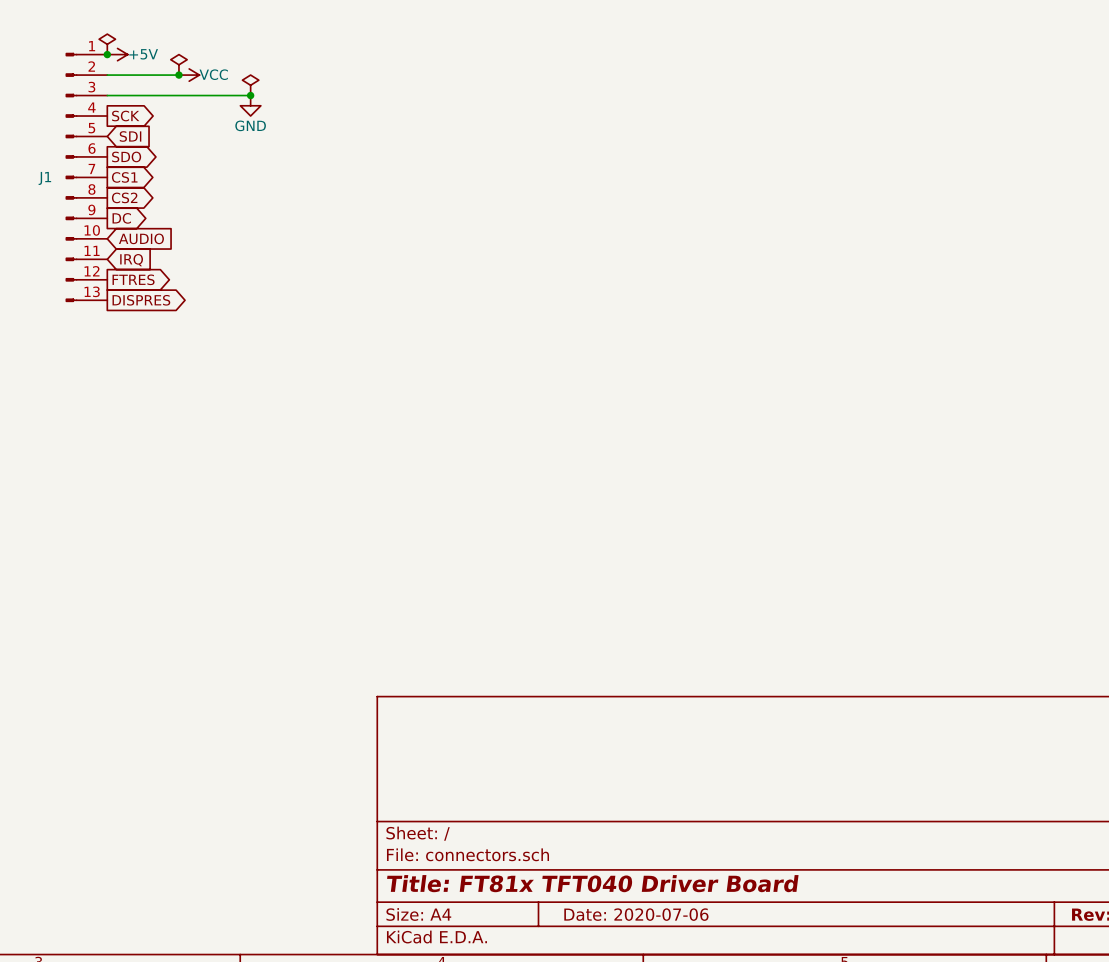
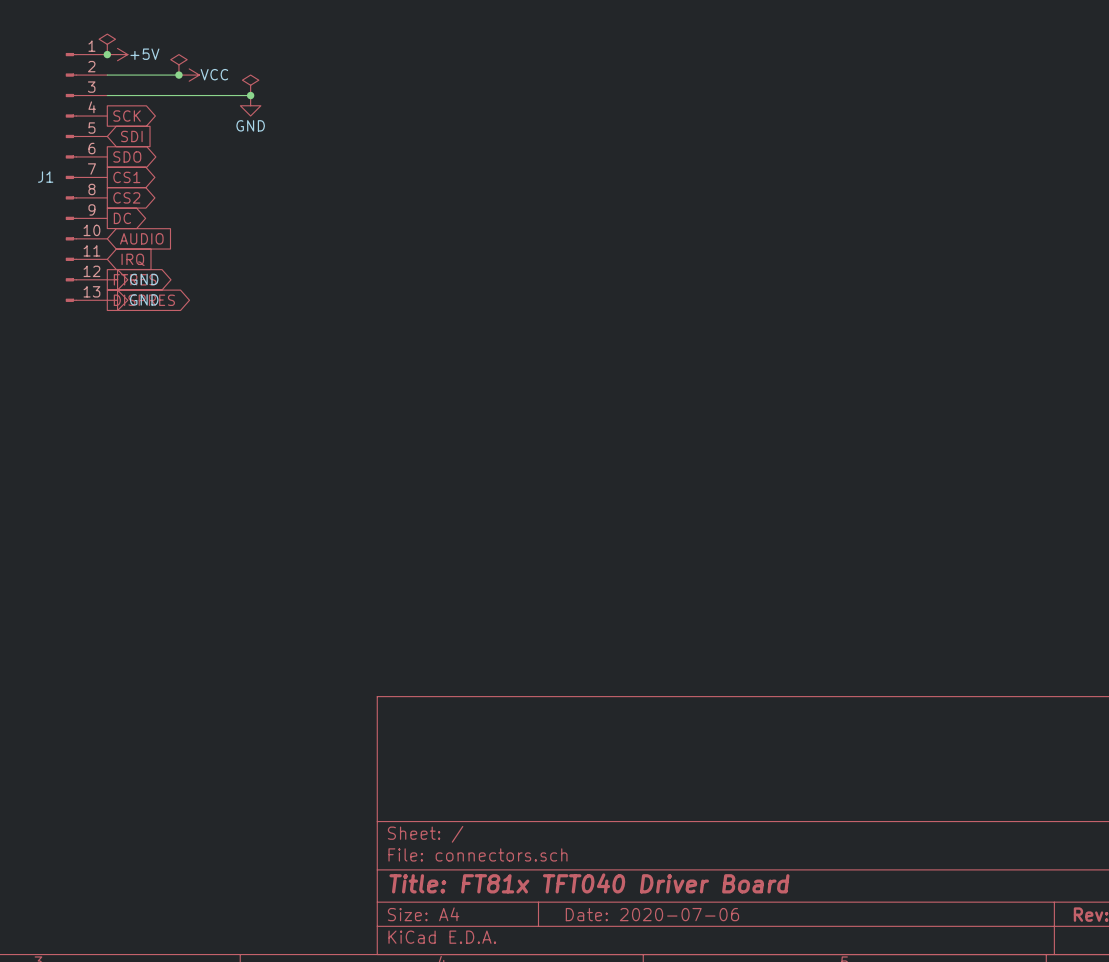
power symbol: none -> GND (117, 279)
power symbol: none -> GND (117, 300)

